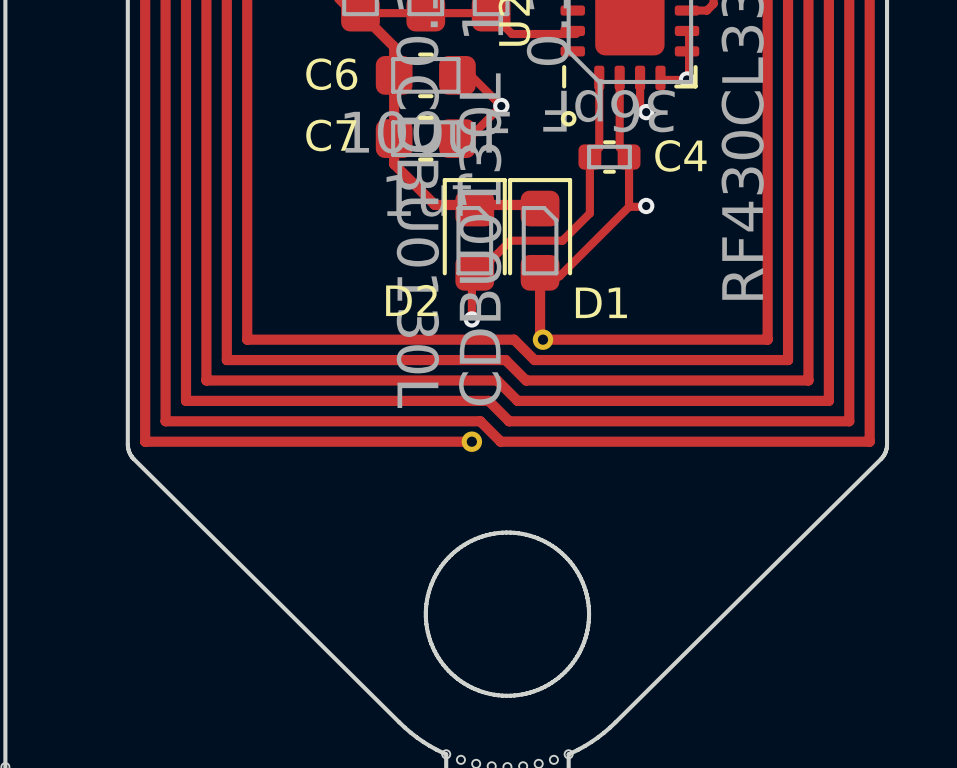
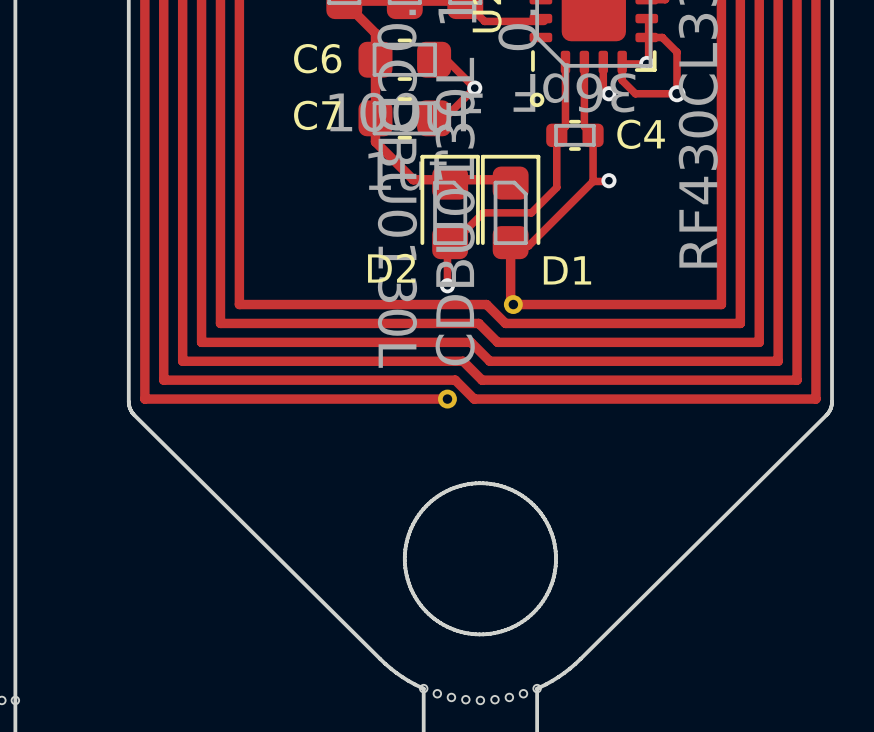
track: none -> (646, 37) (662, 37) (677, 52) (677, 93) (635, 93) (622, 80) (622, 62)
via: none -> (677, 93)

